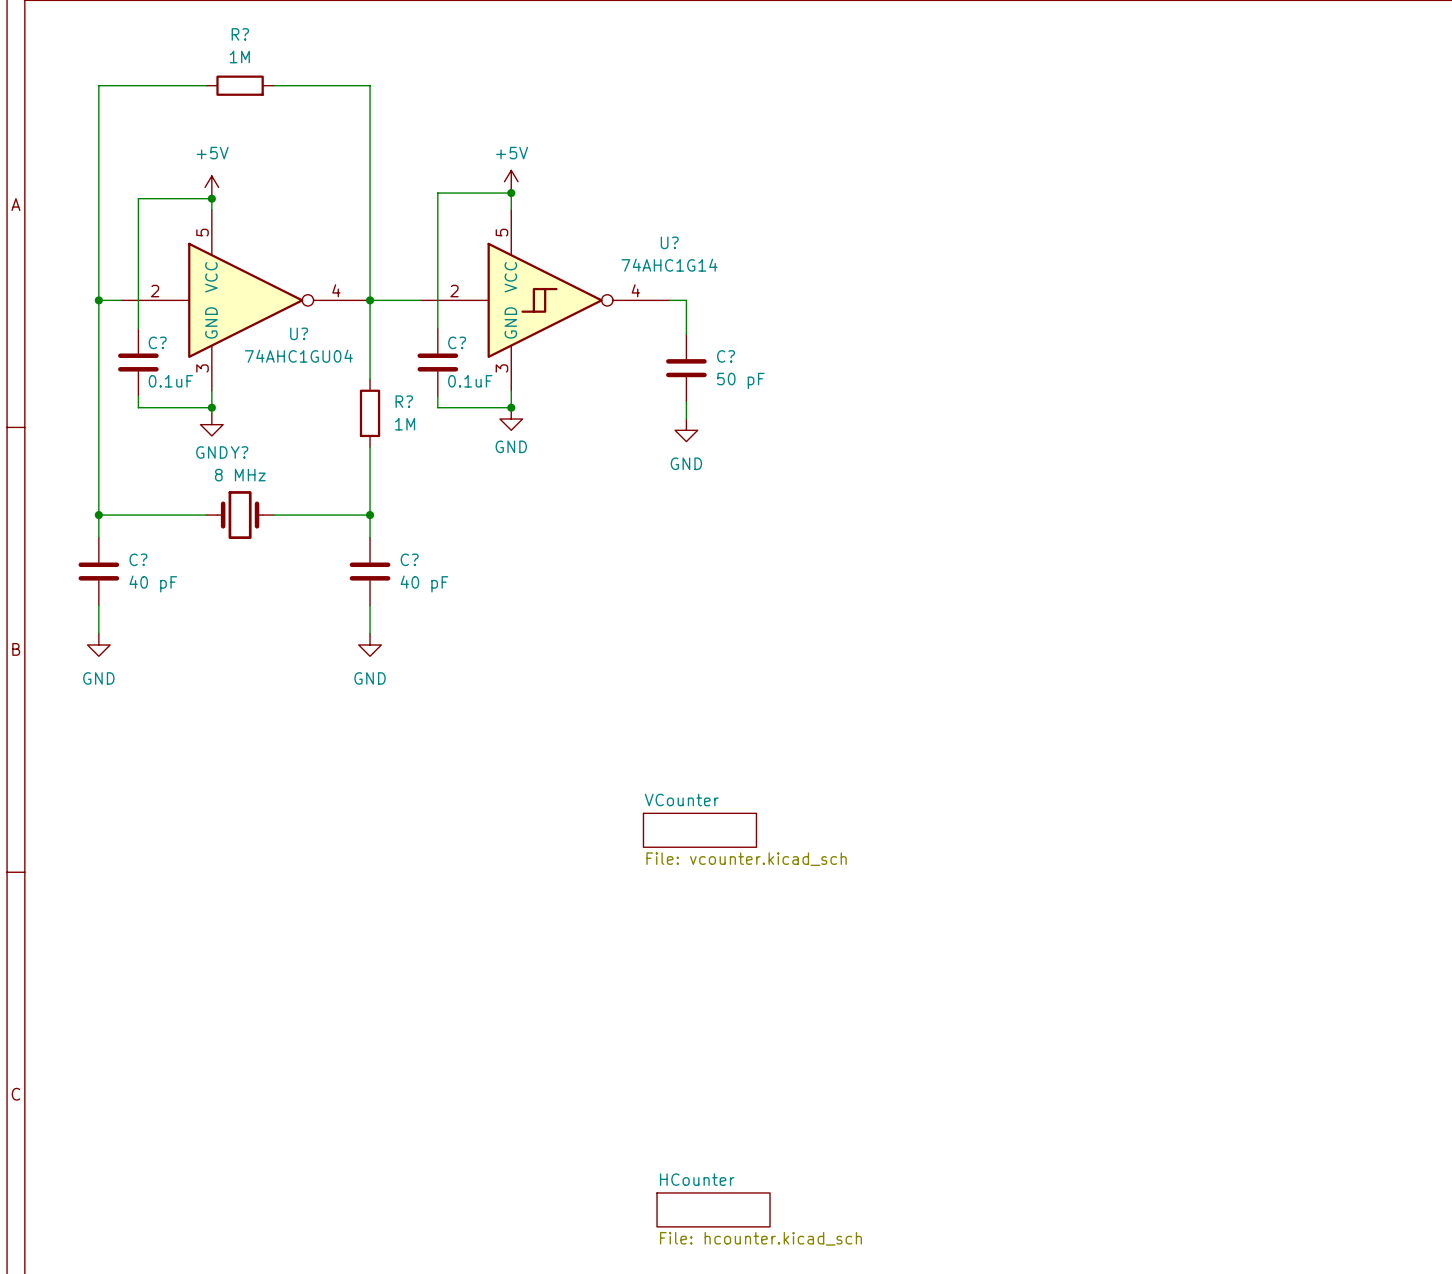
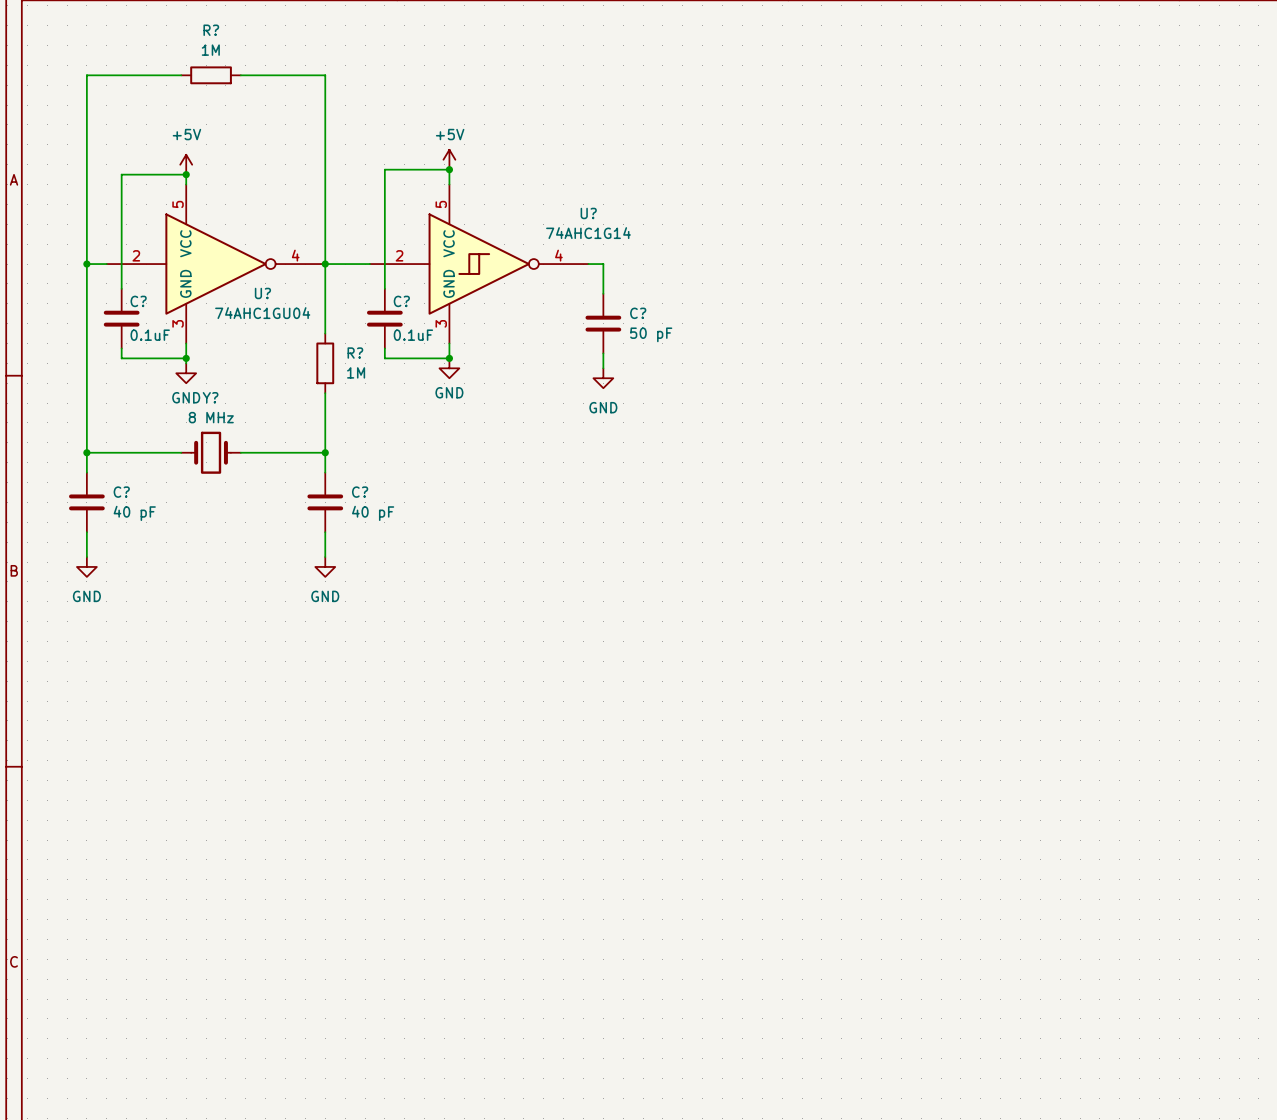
sheet VCounter: File: vcounter.kicad_sch (699, 830) -> none
sheet HCounter: File: hcounter.kicad_sch (713, 1209) -> none

